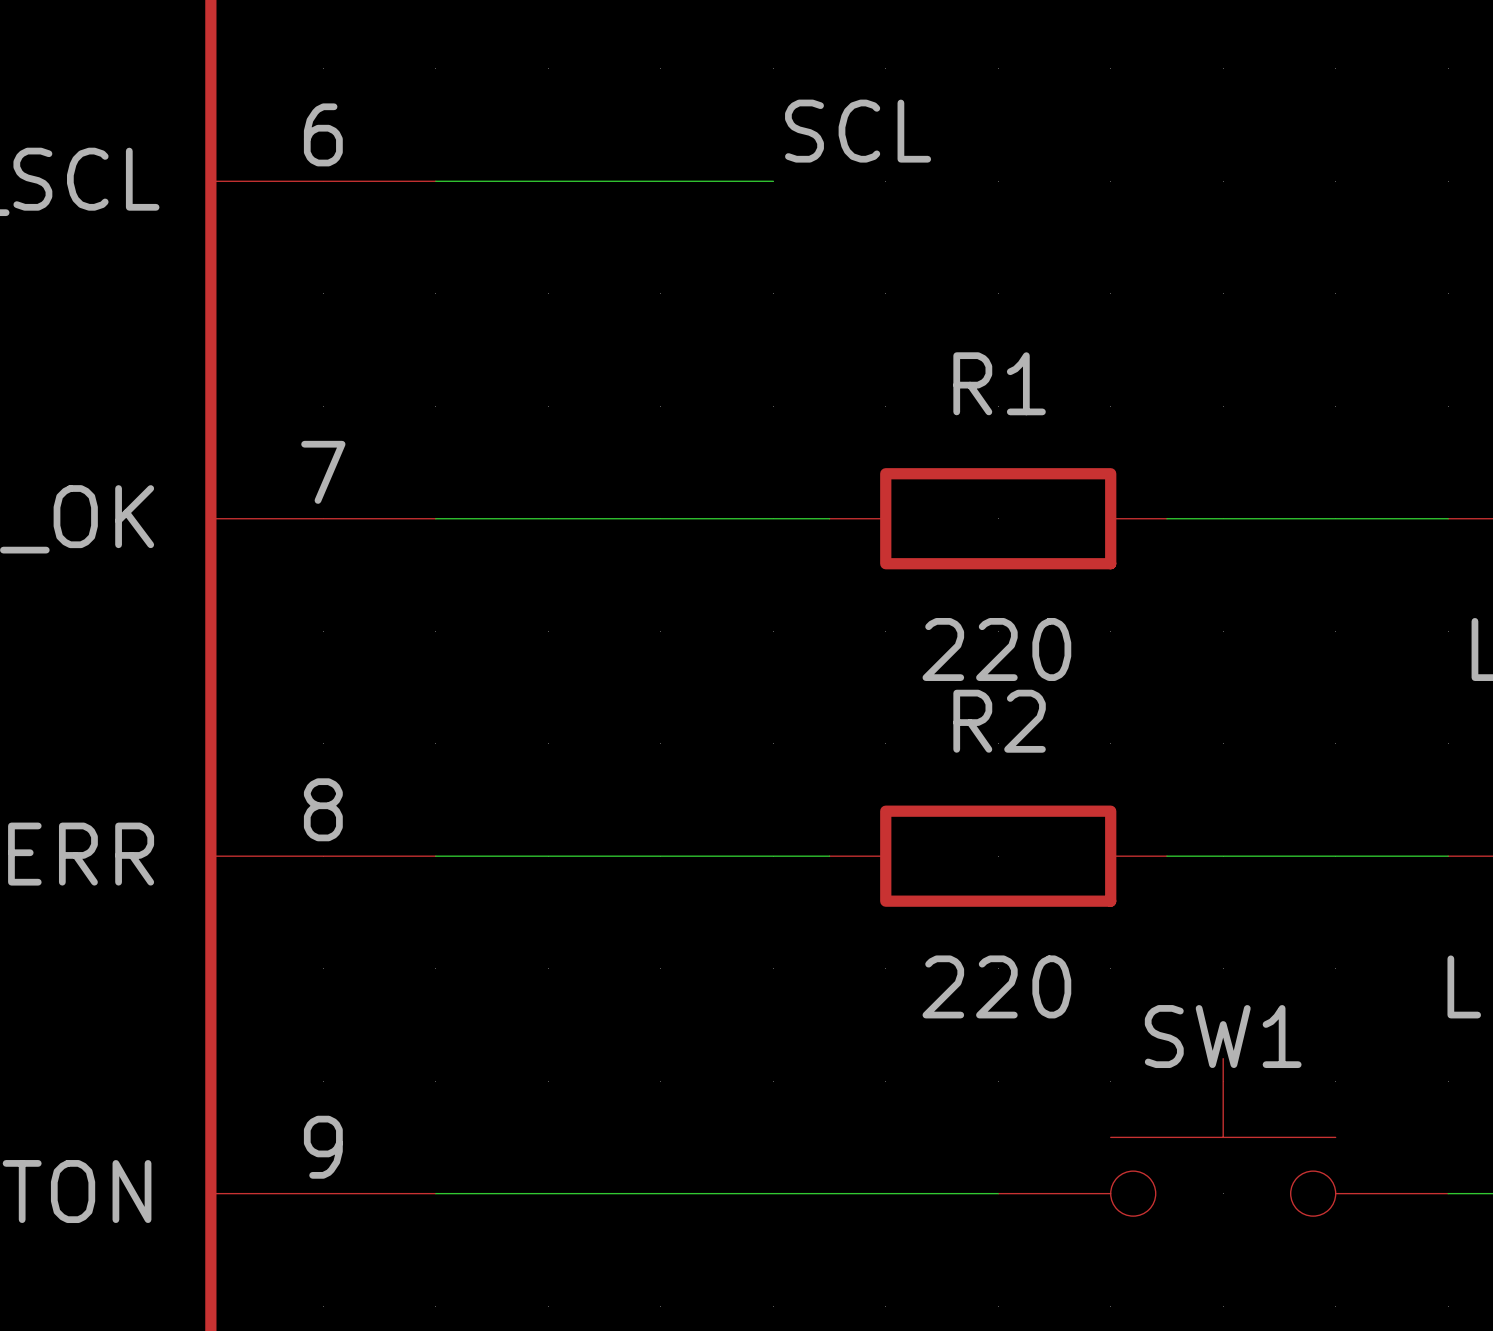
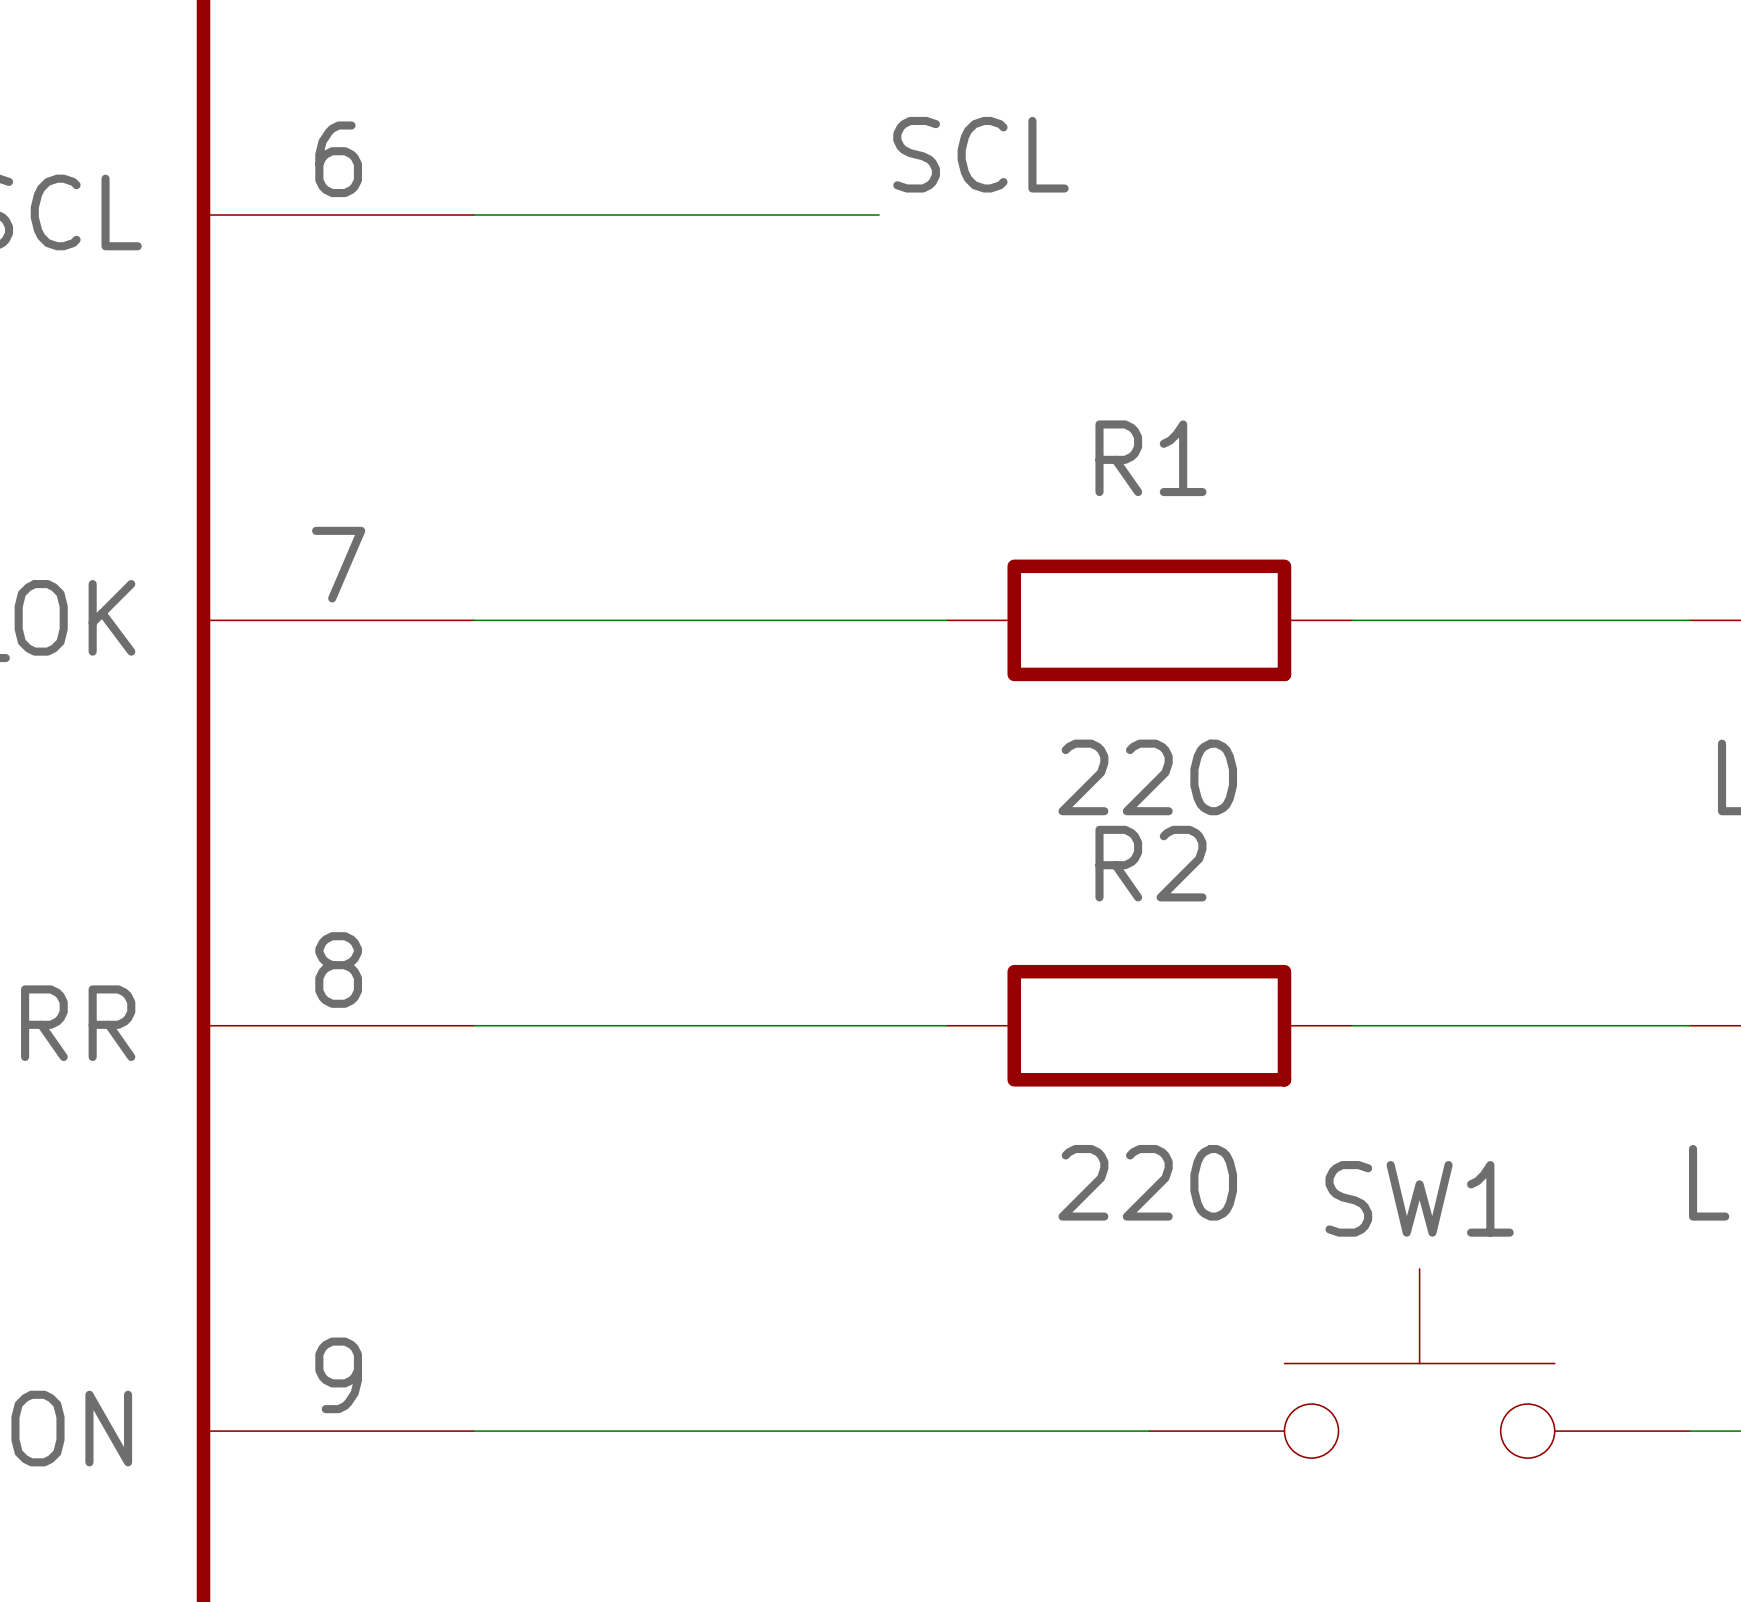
SW1 name position: SW1 (1223, 1036) -> SW1 (1419, 1198)

